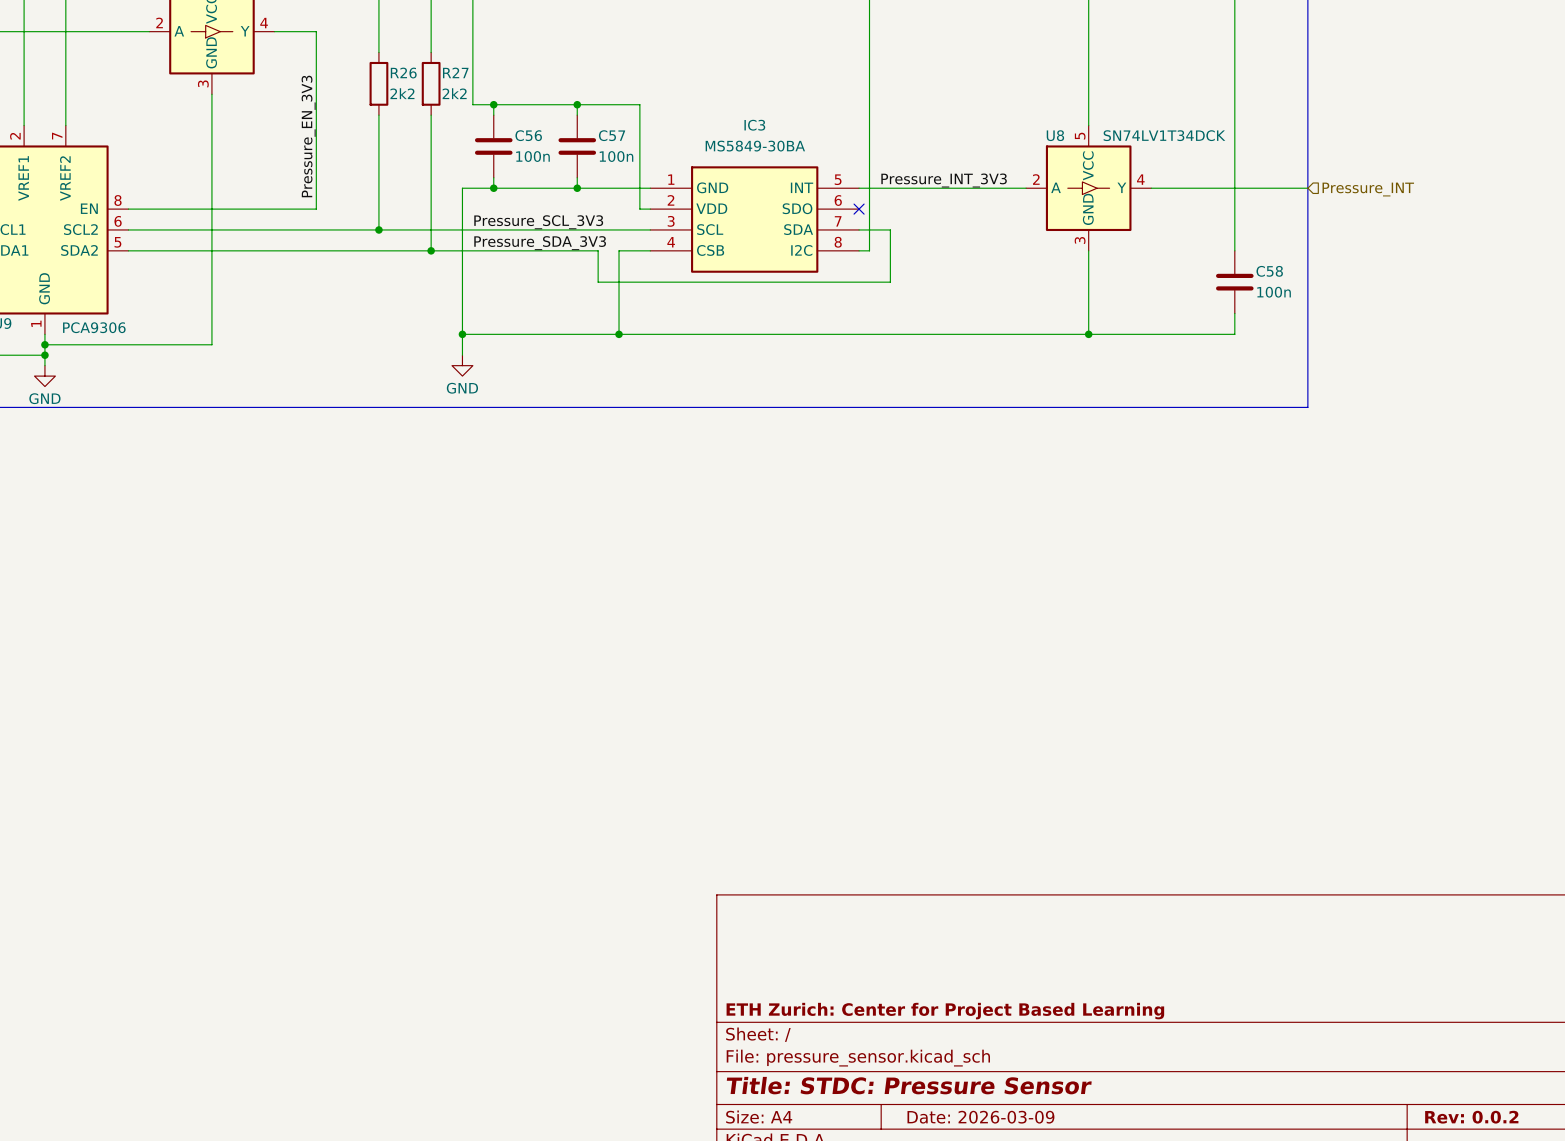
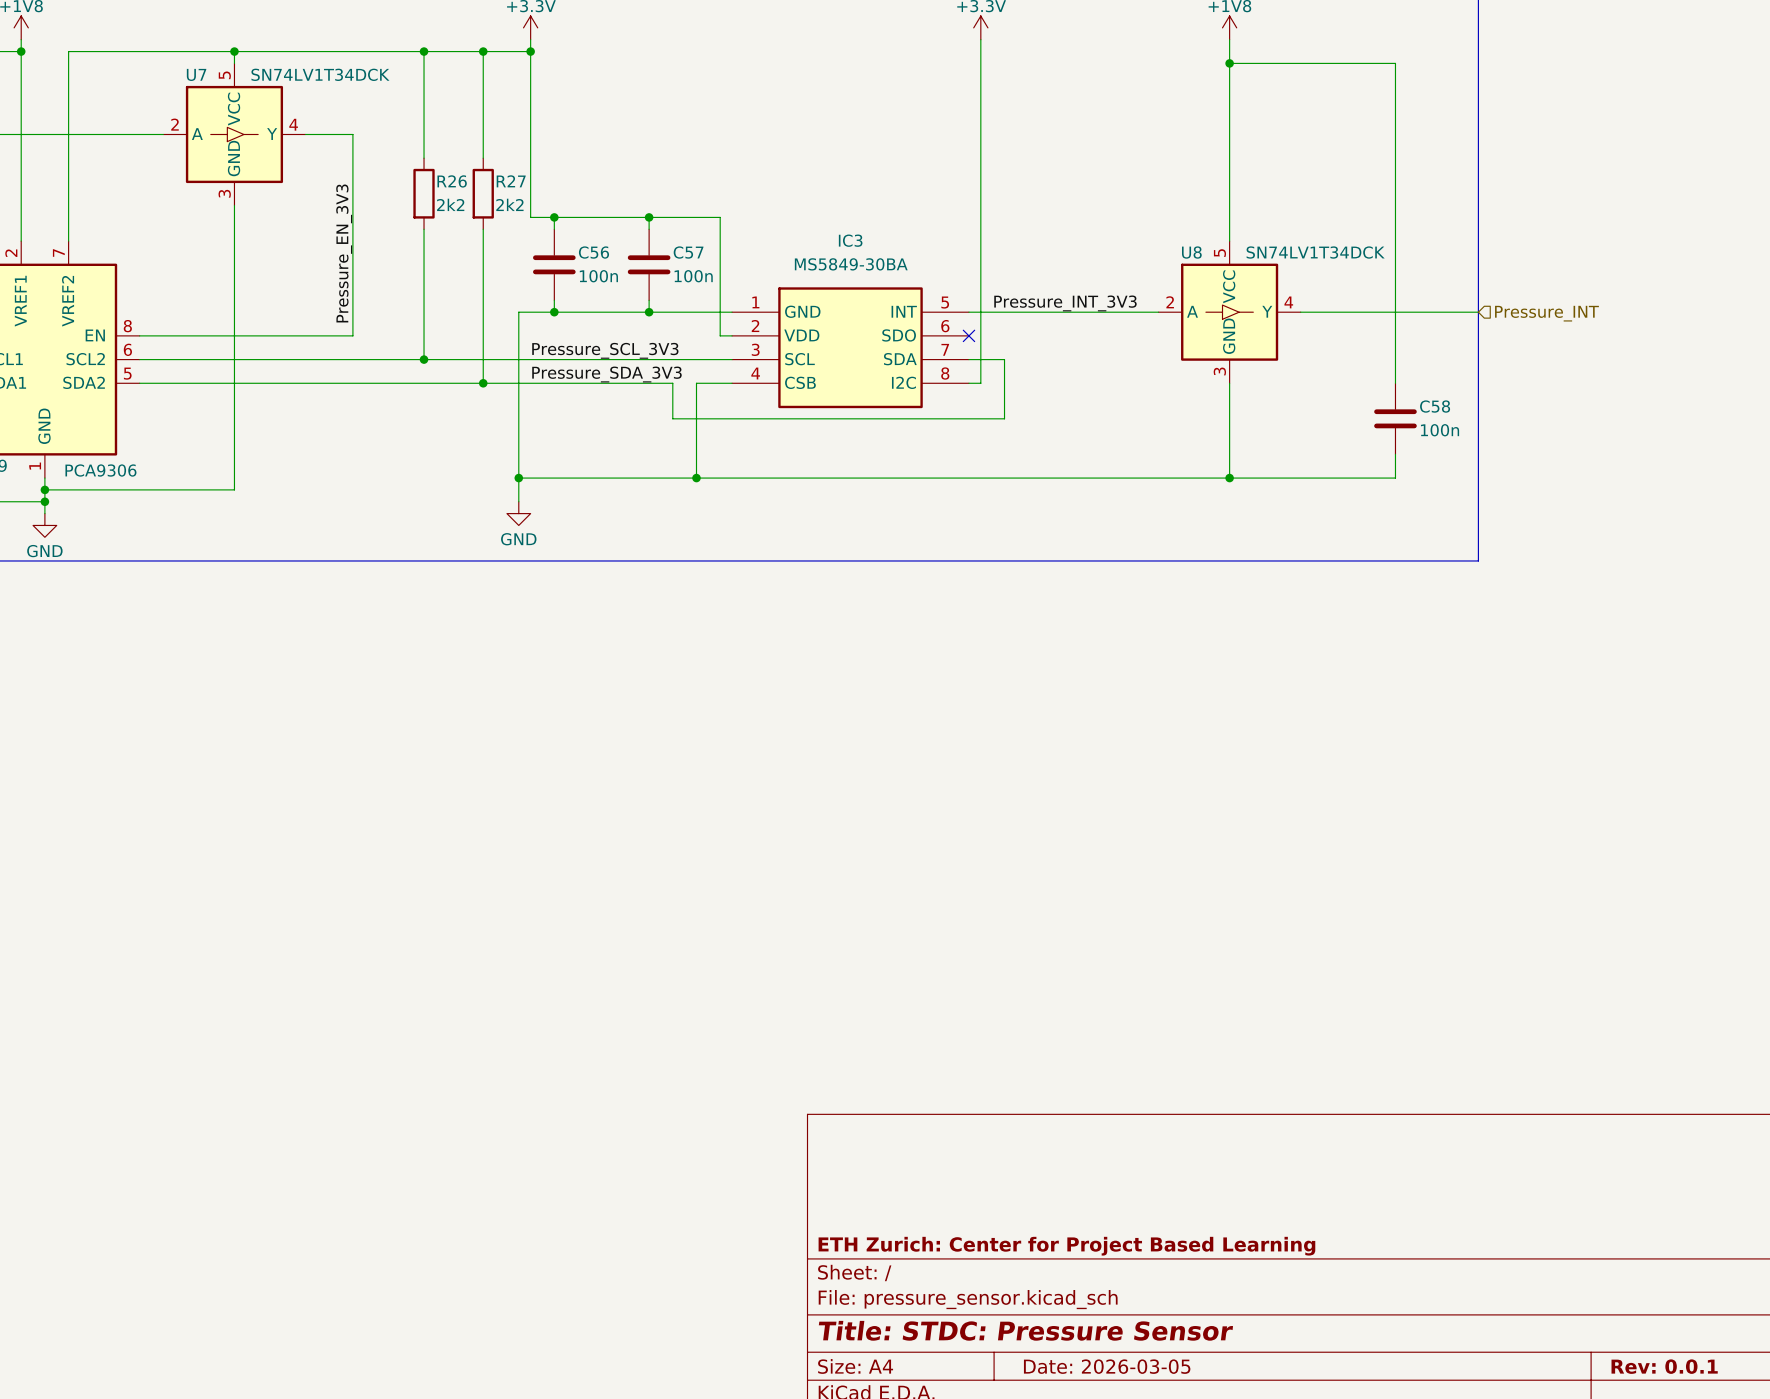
title block: Date: 2026-03-09 (980, 1117) -> Date: 2026-03-05 (1107, 1366)
title block: Rev: 0.0.2 (1471, 1117) -> Rev: 0.0.1 (1664, 1366)

